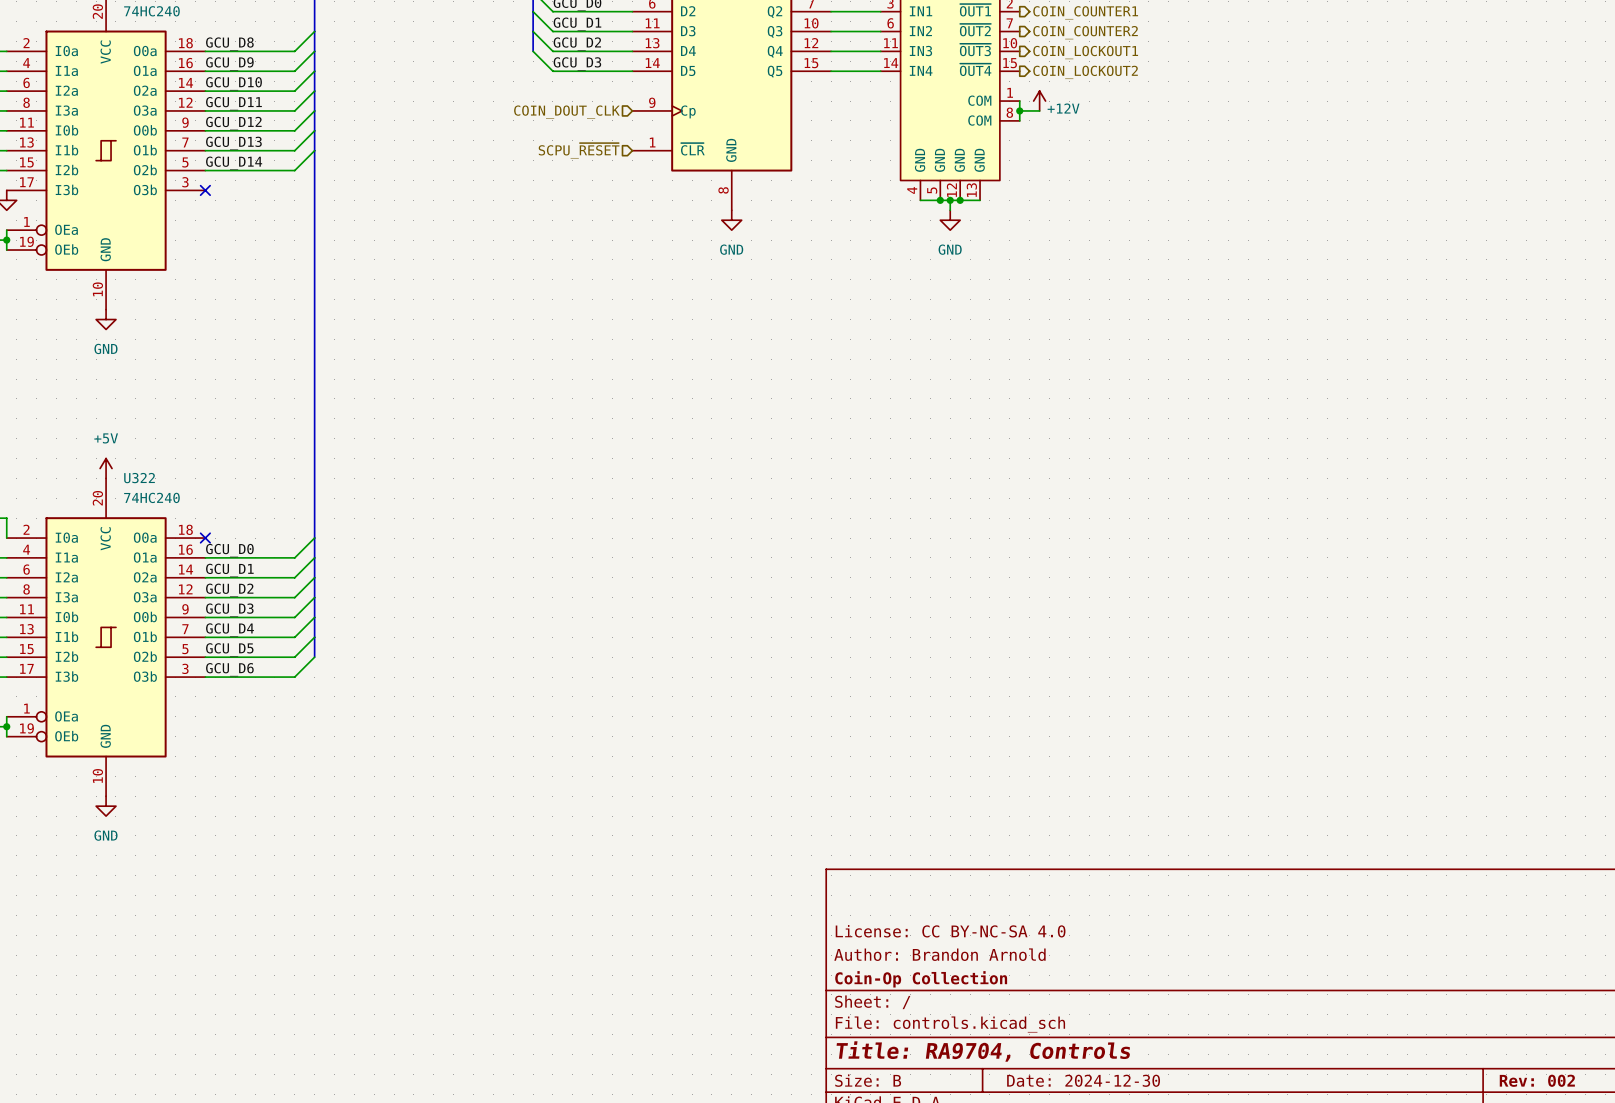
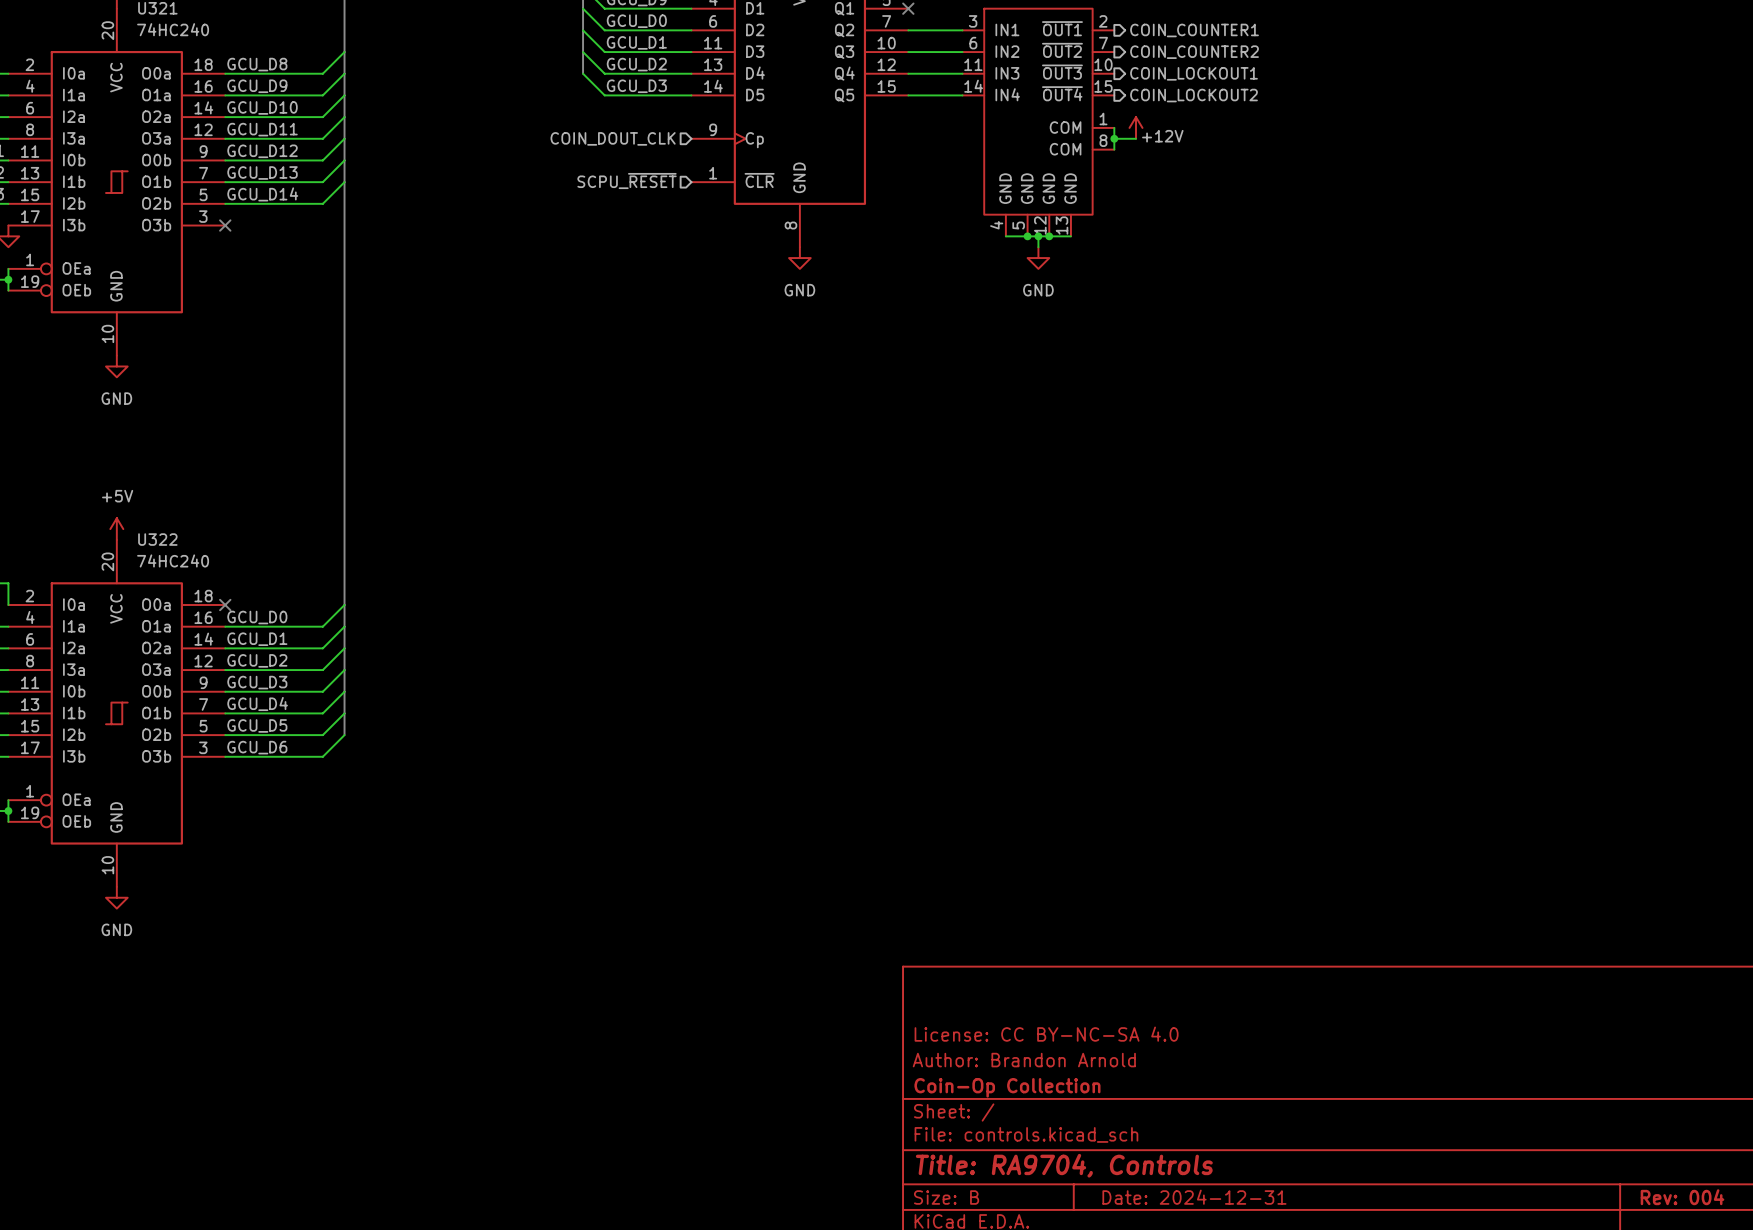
title block: Date: 2024-12-30 (1083, 1080) -> Date: 2024-12-31 (1194, 1197)
title block: Rev: 002 (1537, 1080) -> Rev: 004 (1682, 1197)

